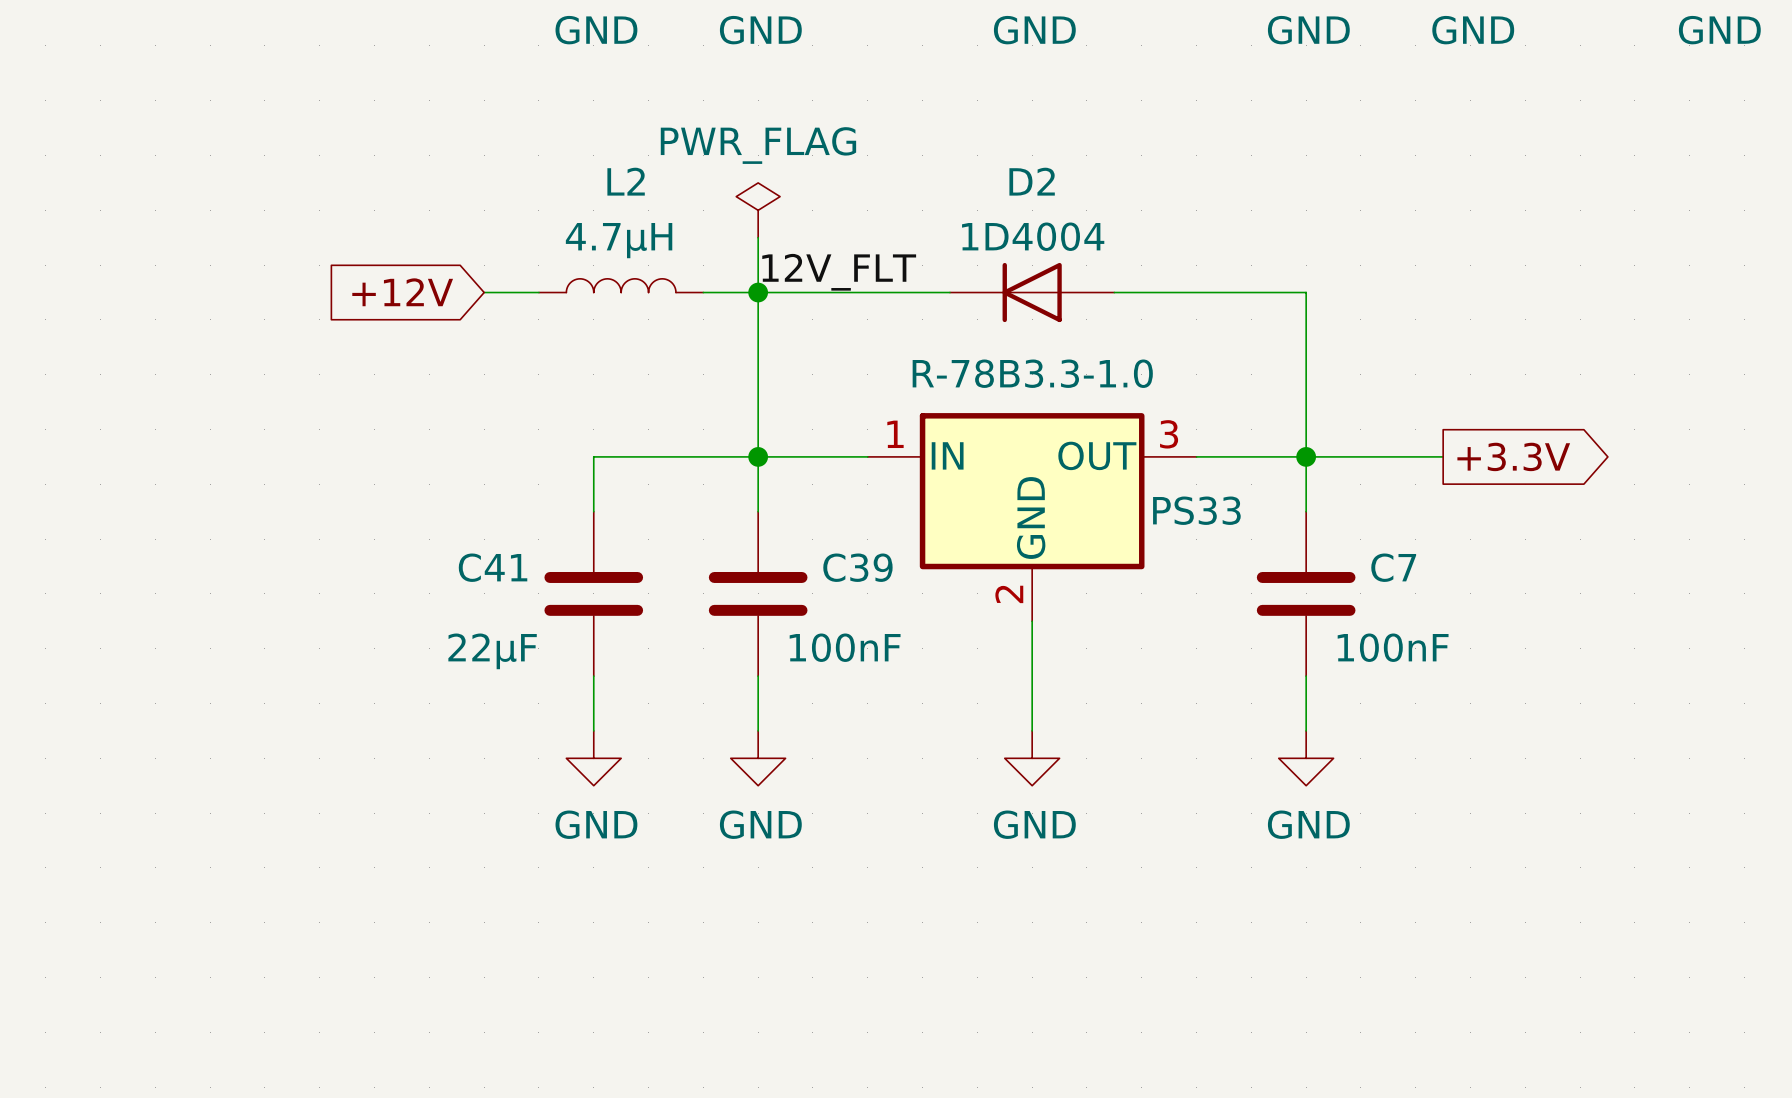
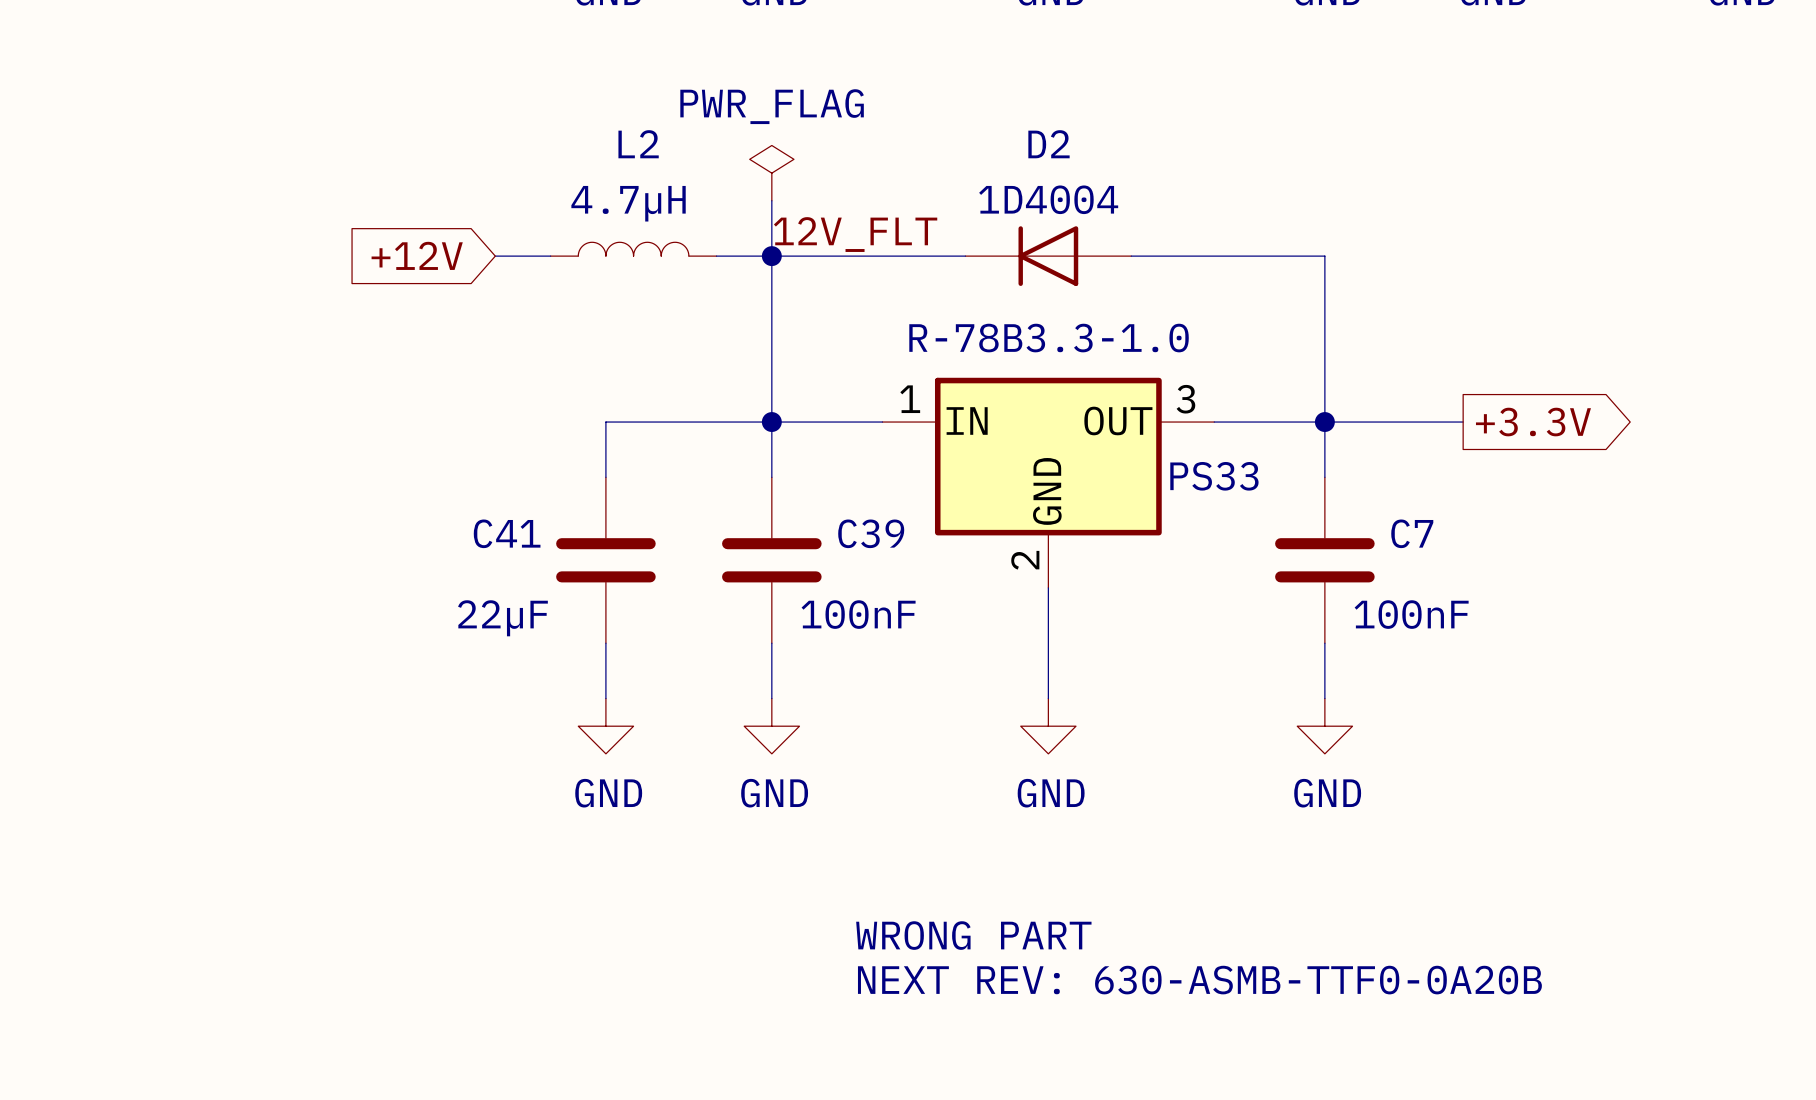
text: none -> WRONG PART (973, 935)
text: none -> NEXT REV: 630-ASMB-TTF0-0A20B (1199, 980)

